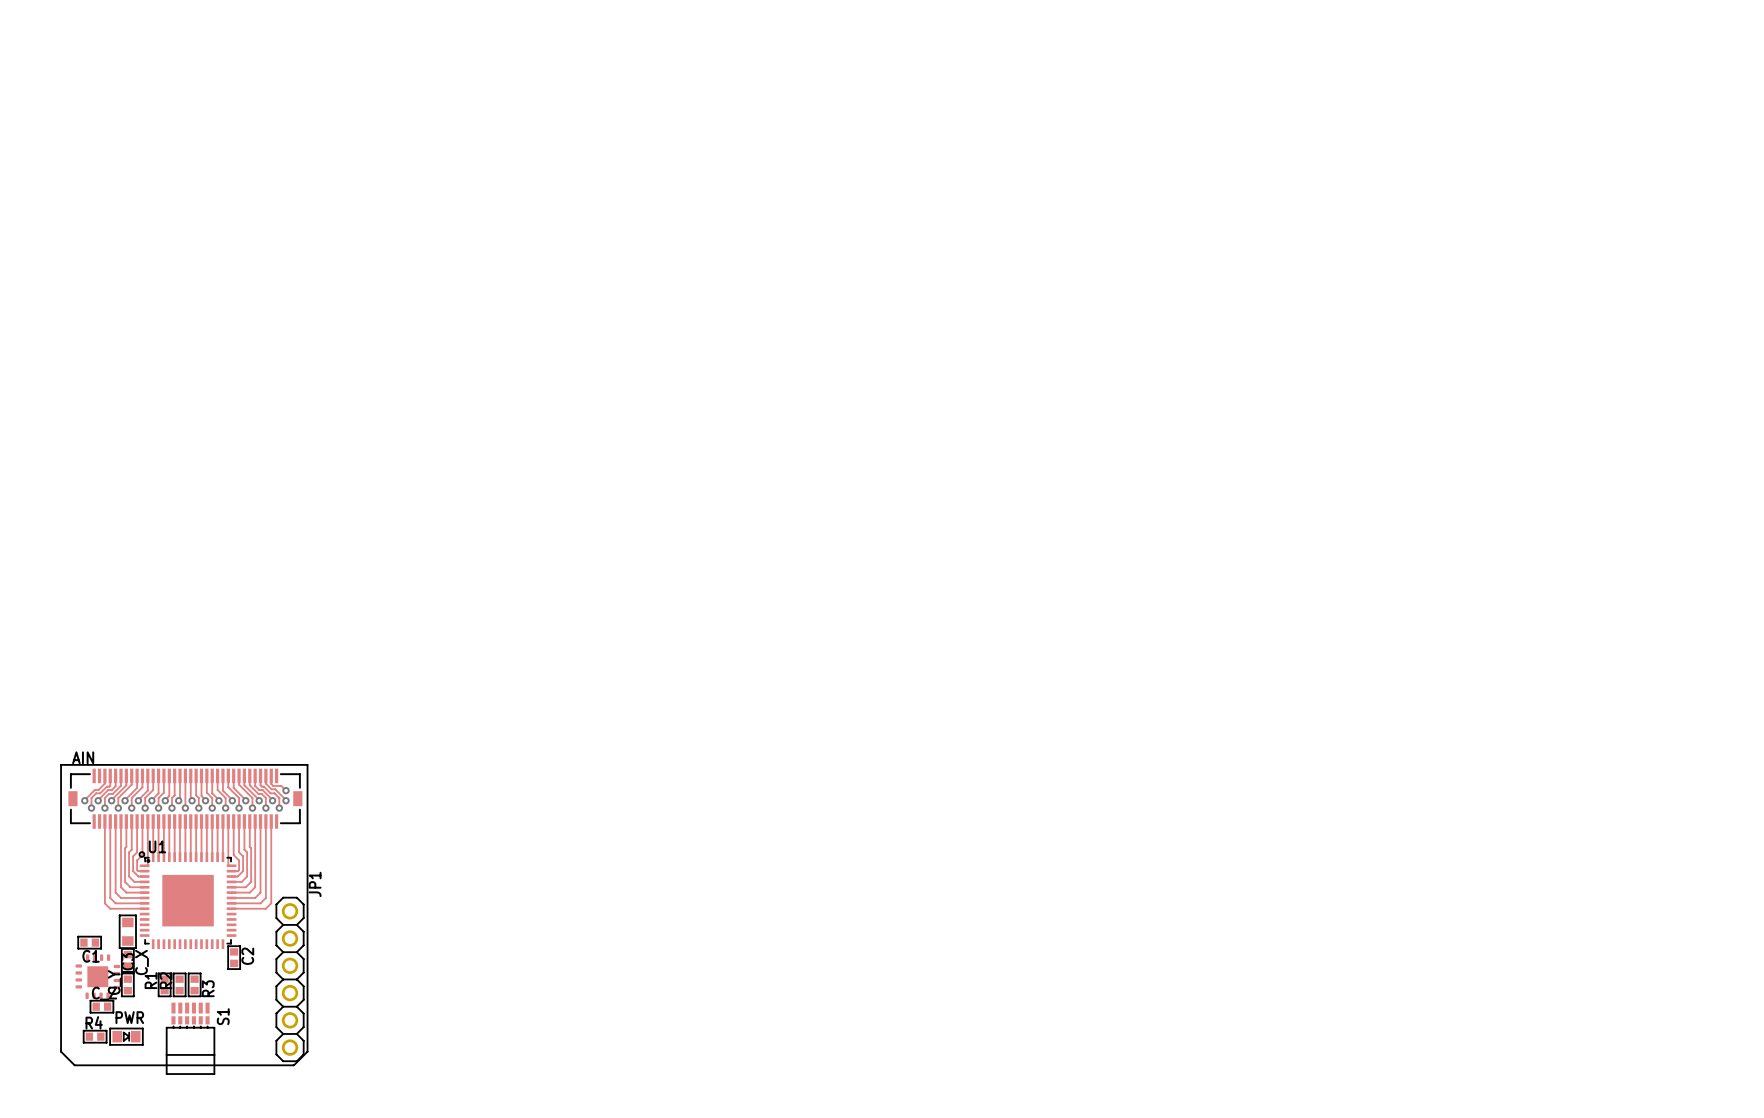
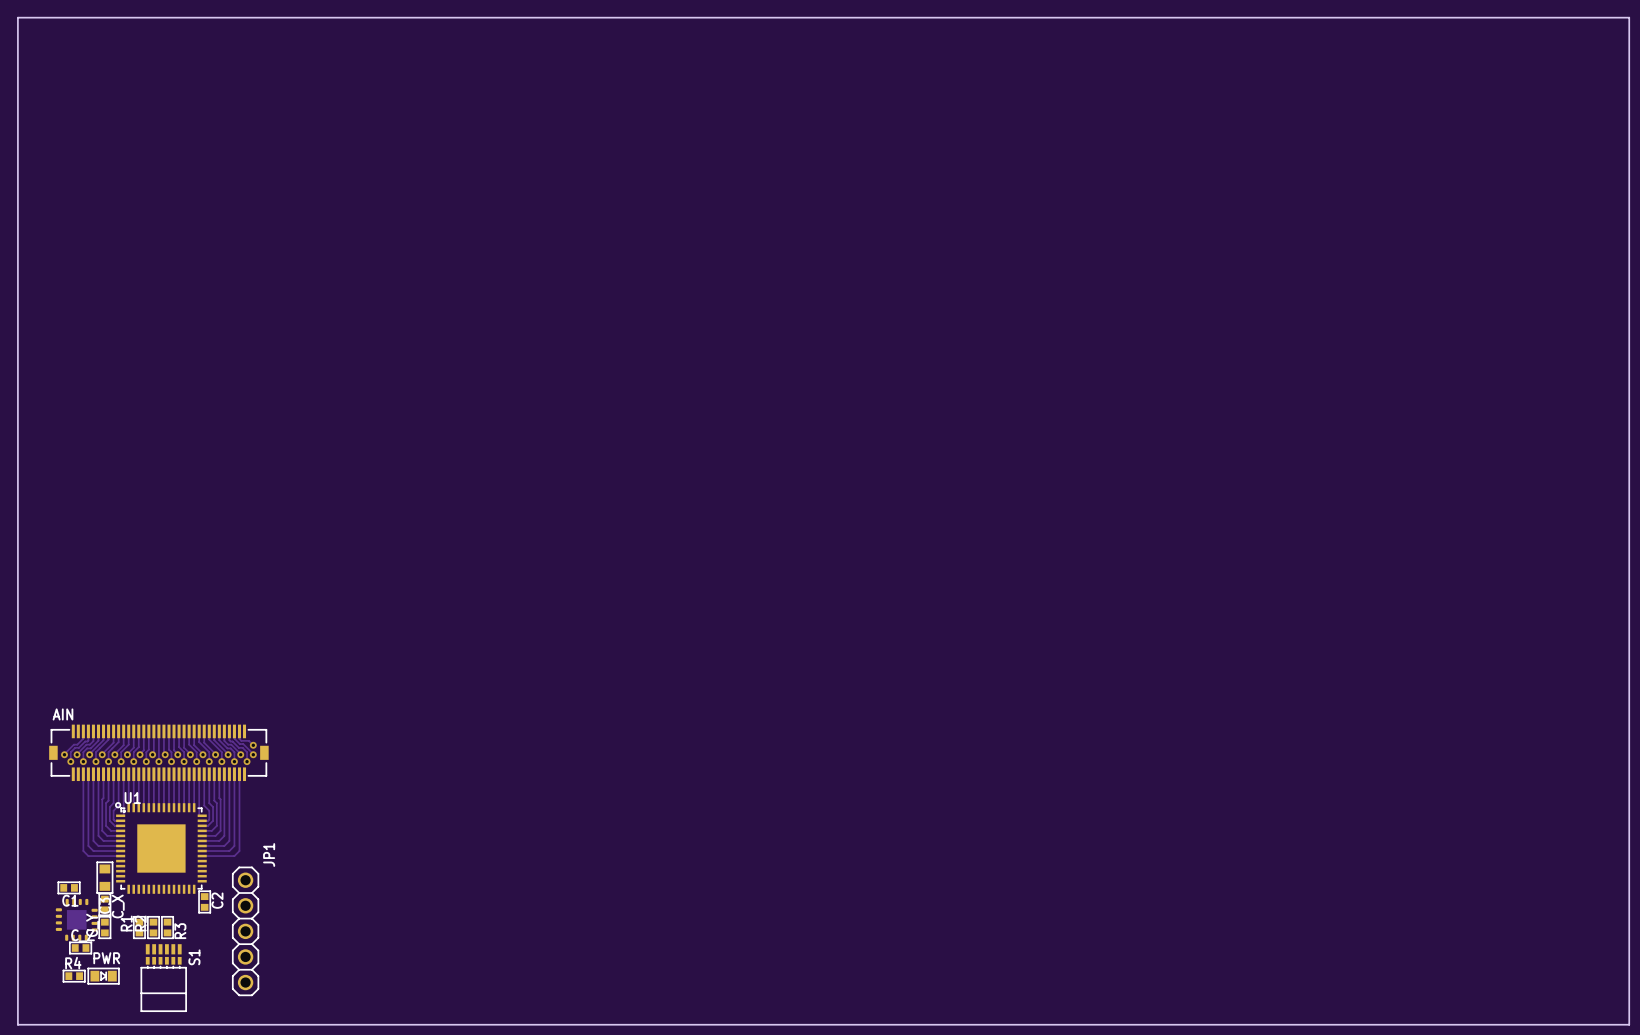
board edge: none -> (17, 17) (1629, 17) (1629, 1024) (17, 1024) (17, 17)
board edge: (61, 764) (61, 1051) (74, 1065) (293, 1065) (307, 1051) (307, 764) (61, 764) -> none
JP1 footprint: [275, 896, 305, 1063] -> [232, 866, 260, 997]

